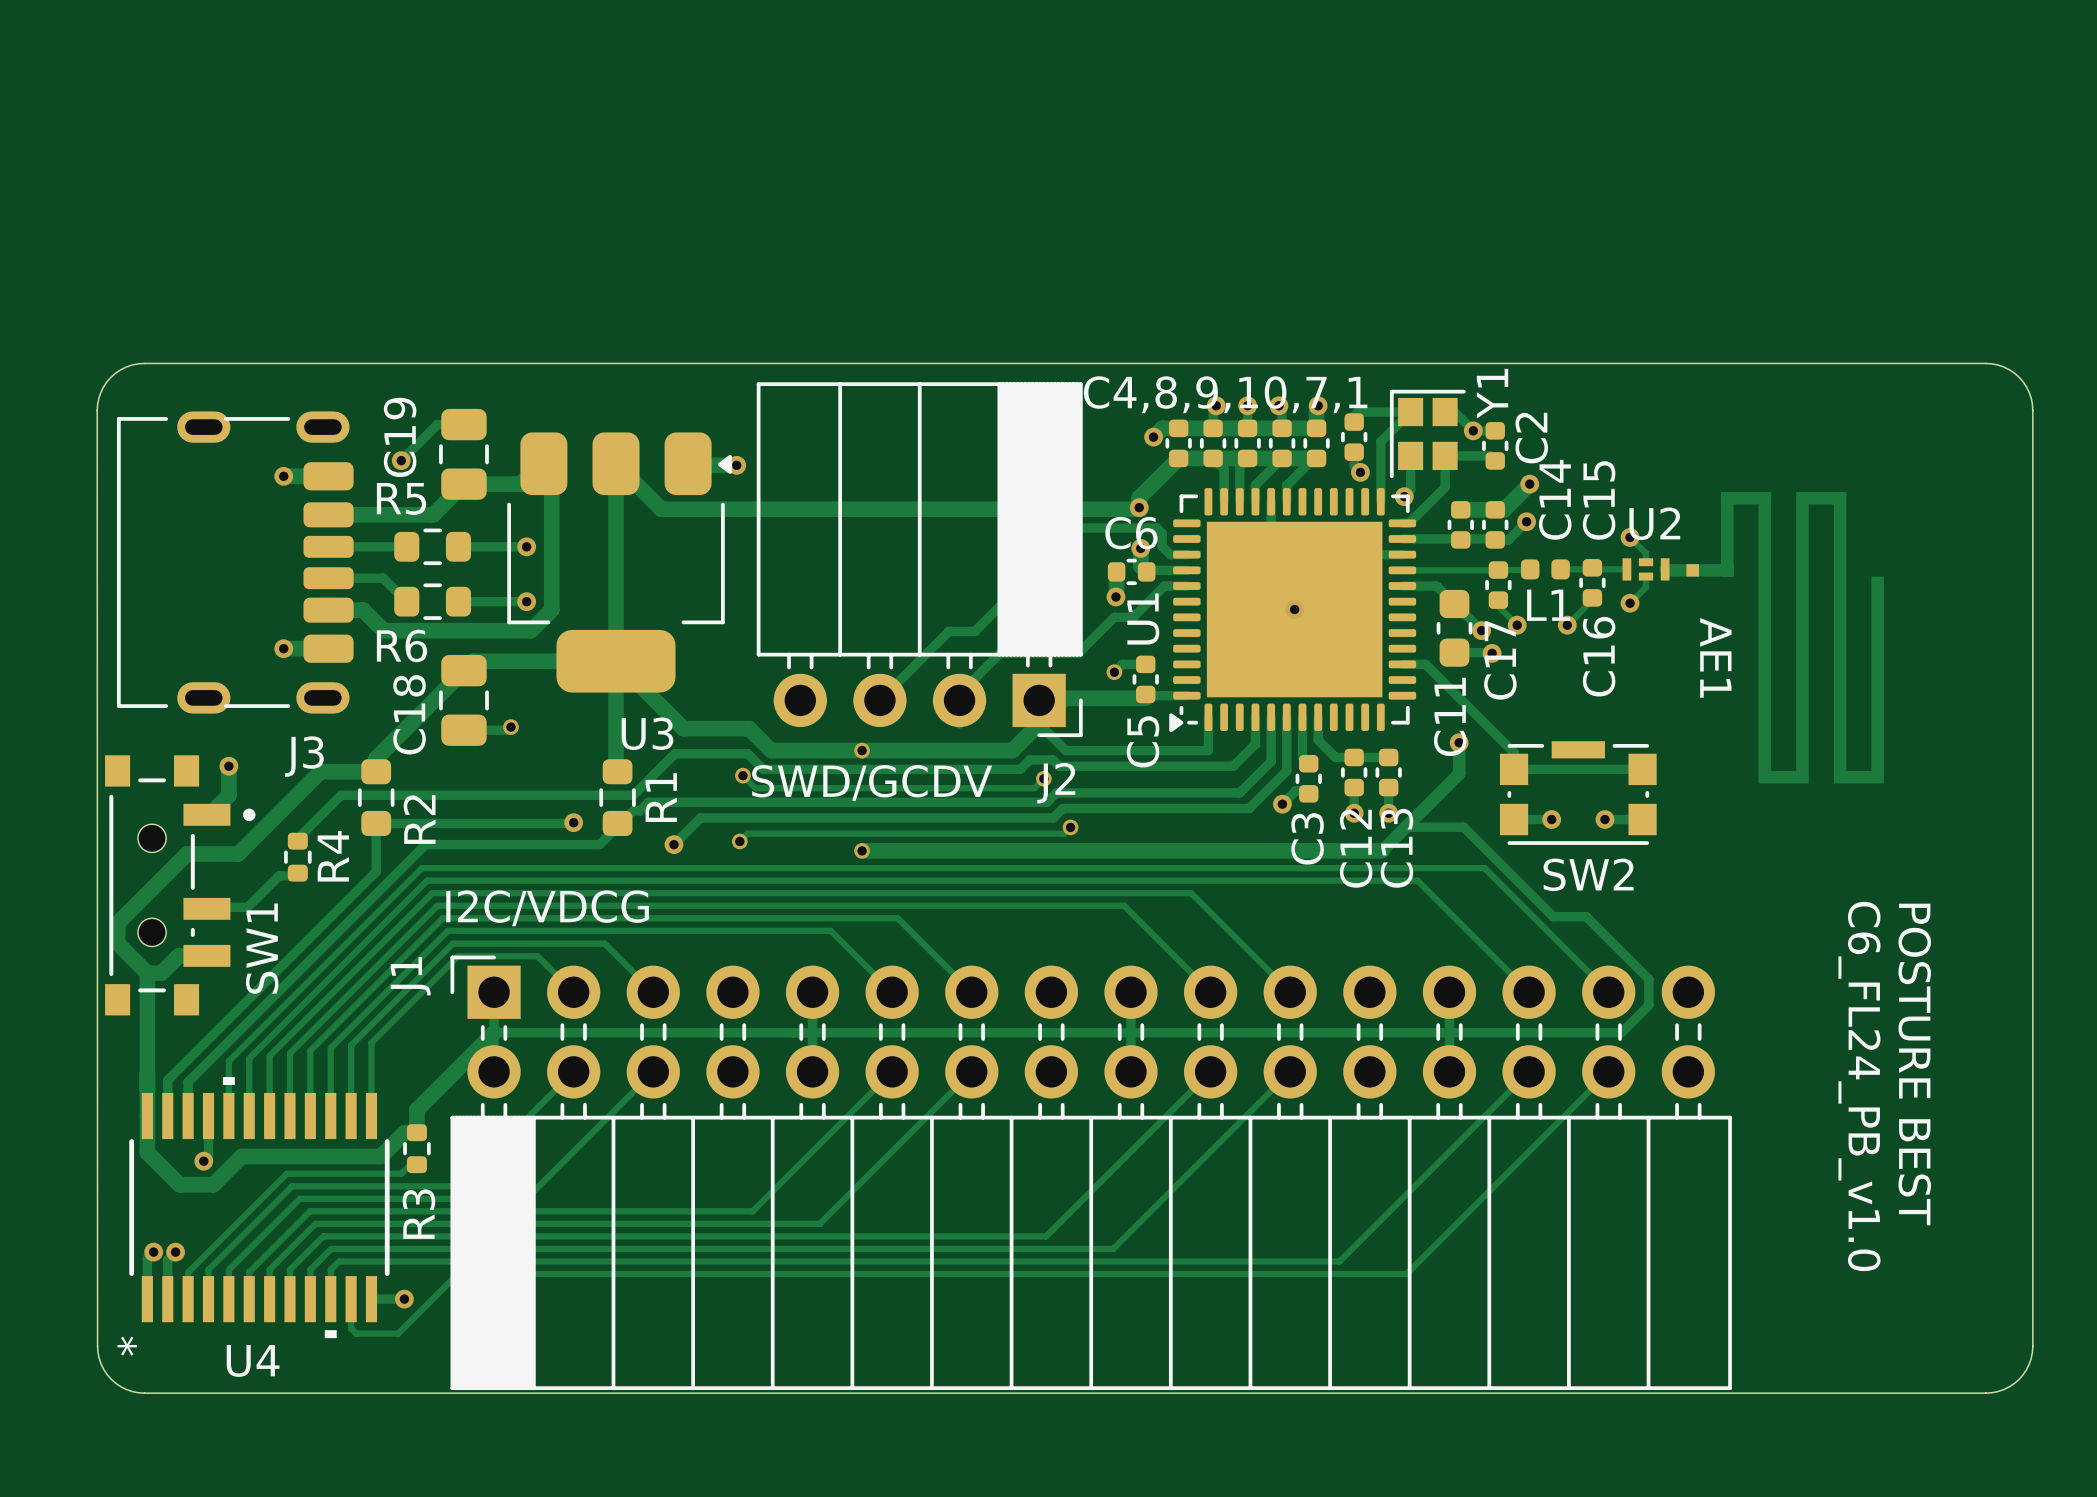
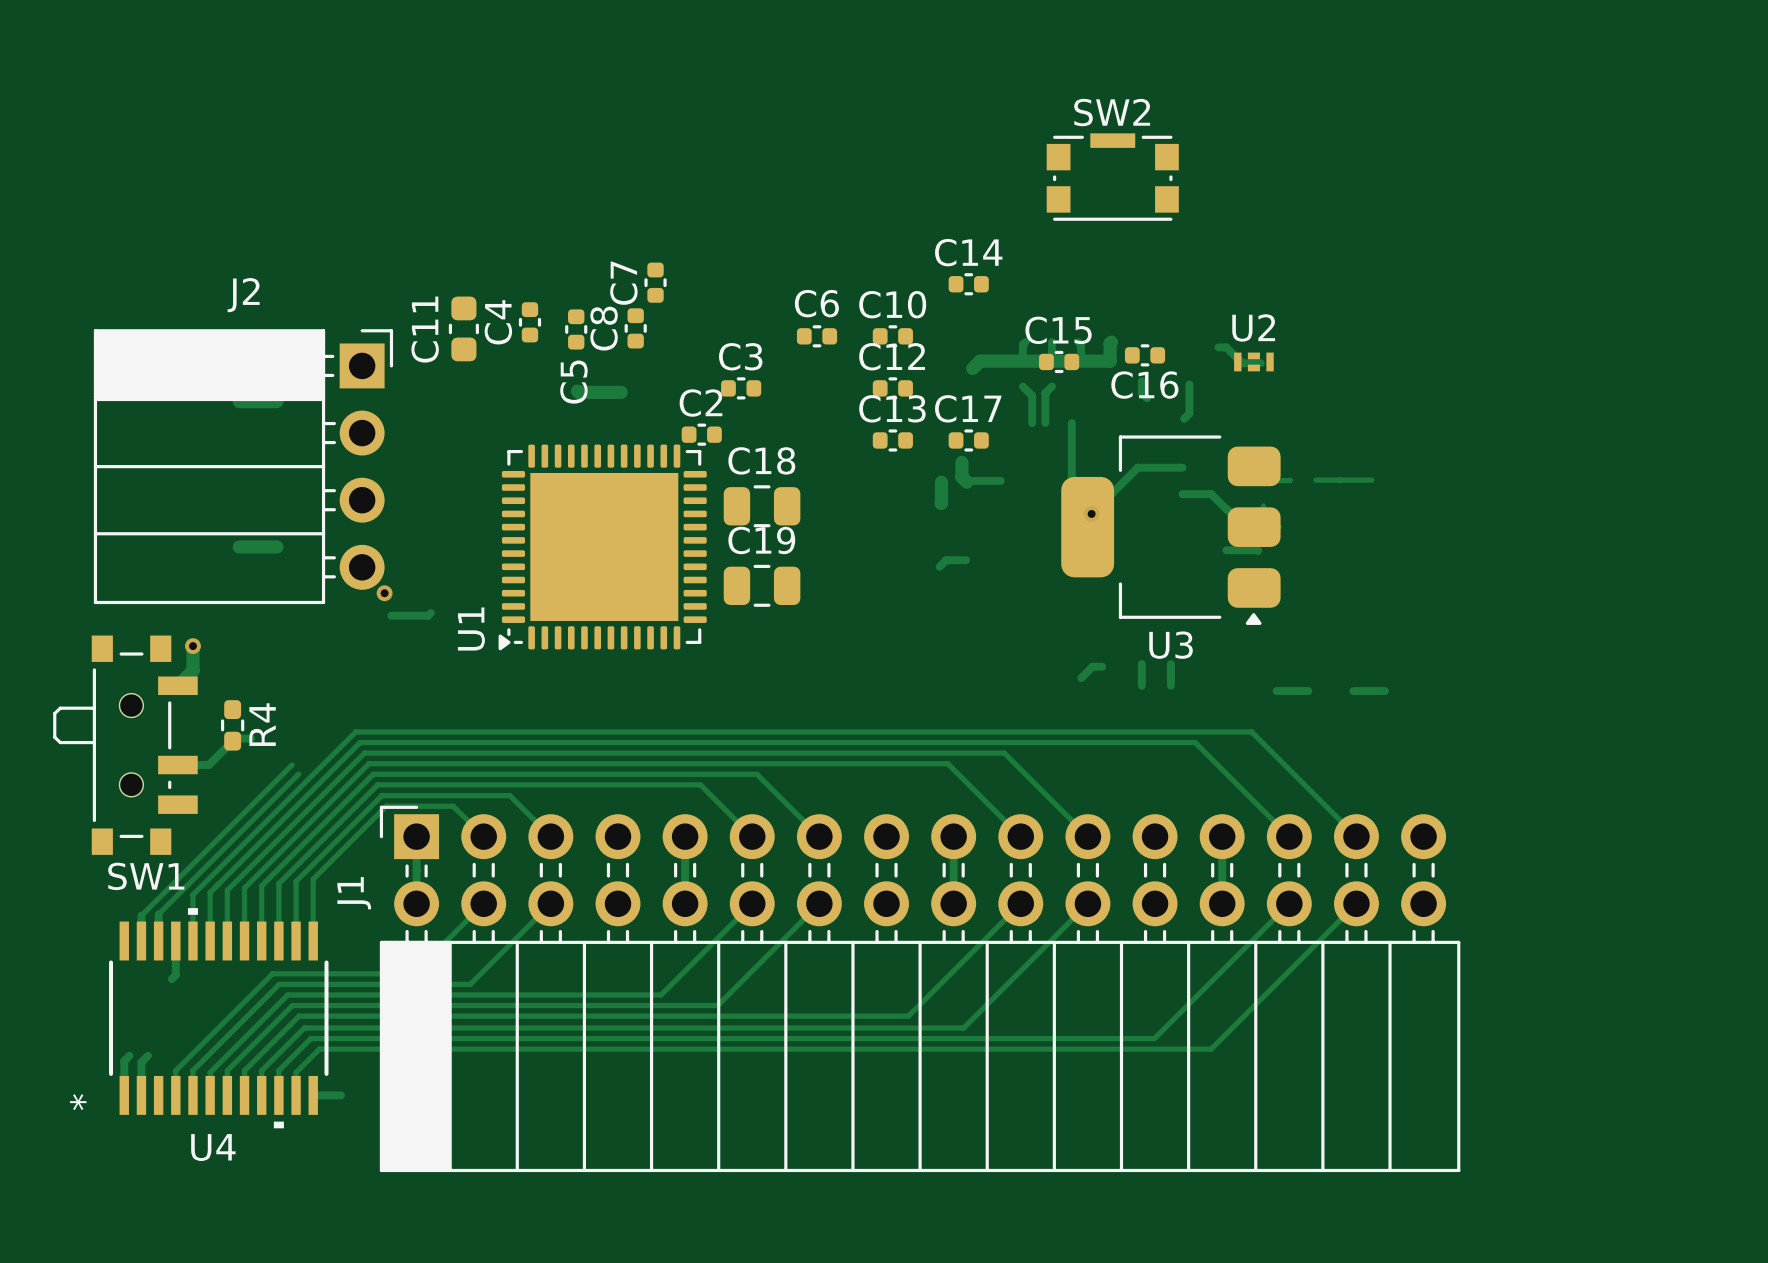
C7: none -> (655, 282)
board edge: (144, 363) (1985, 363) (1997, 365) (2009, 369) (2019, 377) (2026, 386) (2031, 398) (2032, 410) (2032, 1346) (2031, 1358) (2026, 1369) (2019, 1379) (2009, 1386) (1997, 1391) (1985, 1393) (144, 1393) (132, 1391) (121, 1386) (111, 1379) (103, 1369) (99, 1358) (97, 1346) (97, 410) (100, 392) (111, 377) (126, 367) (144, 363) -> none
C4: none -> (529, 322)
C8: none -> (635, 328)
text: C4,8,9,10,7,1 (1225, 394) -> none
C10: none -> (892, 336)
via: (1216, 405) -> none
via: (1247, 405) -> none
via: (1278, 405) -> none
via: (1318, 405) -> none
track: (1354, 415) (1357, 412) (1410, 412) (1380, 441) (1380, 501) -> none
track: (463, 424) (437, 424) (401, 460) -> none
via: (1473, 430) -> none
Y1: (1427, 433) -> none
via: (1153, 437) -> none
part: (1354, 437) -> none
part: (1178, 443) -> none
part: (1213, 443) -> none
part: (1247, 443) -> none
part: (1282, 443) -> none
part: (1316, 443) -> none
C2 rotation: 0° (1495, 445) -> 90° clockwise (701, 434)
C2 position: (1495, 445) -> (701, 434)
C19 rotation: 0° (463, 454) -> 90° clockwise (762, 585)
C19 position: (463, 454) -> (762, 585)
track: (1282, 458) (1255, 485) (1255, 501) -> none
via: (401, 460) -> none
track: (1495, 460) (1490, 455) (1445, 455) (1445, 487) (1409, 523) (1402, 523) -> none
track: (531, 463) (540, 463) (520, 484) (463, 484) (433, 514) (328, 514) -> none
track: (543, 463) (551, 471) (551, 609) (530, 630) (383, 630) (363, 610) (328, 610) -> none
via: (736, 465) -> none
via: (1360, 472) -> none
via: (283, 476) -> none
track: (1529, 484) (1504, 509) (1460, 509) -> none
via: (1529, 484) -> none
via: (1404, 496) -> none
C14 name position: C14 (1555, 499) -> C14 (968, 252)
C15 name position: C15 (1599, 500) -> C15 (1058, 330)
track: (1286, 501) (1286, 485) (1313, 458) (1316, 458) (1178, 458) (1139, 497) (1139, 507) -> none
track: (1139, 507) (661, 509) (616, 463) (616, 773) (617, 774) -> none
via: (1139, 507) -> none
track: (1526, 521) (1508, 539) (1402, 538) -> none
via: (1526, 521) -> none
U2 name position: U2 (1654, 523) -> U2 (1253, 327)
C14 rotation: 0° (1460, 524) -> 90° clockwise (968, 284)
C14 position: (1460, 524) -> (968, 284)
C15 rotation: 0° (1495, 524) -> 90° clockwise (1059, 361)
C15 position: (1495, 524) -> (1059, 361)
track: (1630, 537) (1646, 553) (1646, 562) -> none
via: (1630, 537) -> none
track: (328, 546) (406, 546) -> none
R5: (432, 546) -> none
track: (458, 546) (526, 546) -> none
via: (526, 546) -> none
via: (1140, 548) -> none
track: (1186, 554) (1170, 554) (1162, 546) (1162, 533) (1156, 528) (1078, 528) (974, 631) (948, 631) (879, 700) -> none
J2 rotation: 0° (919, 559) -> 90° counterclockwise (243, 466)
J2 position: (919, 559) -> (243, 466)
J3: (235, 562) -> none
U3 rotation: 0° (619, 562) -> 90° clockwise (1170, 530)
U3 position: (619, 562) -> (1170, 530)
L1: (1545, 569) -> none
U2 position: (1646, 569) -> (1253, 361)
track: (1665, 569) (1692, 570) -> none
track: (1402, 570) (1498, 570) -> none
C6 position: (1131, 571) -> (817, 336)
track: (1646, 576) (1646, 587) (1630, 603) -> none
track: (328, 578) (383, 578) (406, 601) -> none
C16 rotation: 0° (1592, 582) -> 90° clockwise (1145, 355)
C16 position: (1592, 582) -> (1145, 355)
C17 rotation: 0° (1498, 585) -> 90° clockwise (968, 440)
C17 position: (1498, 585) -> (968, 440)
track: (1186, 586) (1164, 586) (1133, 617) (1114, 617) (1078, 653) (999, 653) (959, 693) (959, 723) -> none
via: (1115, 596) -> none
track: (1589, 600) (1589, 603) (1567, 625) -> none
R6: (432, 601) -> none
track: (458, 601) (526, 601) -> none
via: (526, 601) -> none
via: (1630, 603) -> none
U1 position: (1292, 610) -> (602, 547)
U1 name position: U1 (1143, 619) -> U1 (471, 629)
via: (1517, 625) -> none
via: (1567, 625) -> none
C11 position: (1454, 628) -> (463, 328)
via: (1481, 630) -> none
AE1: (1785, 637) -> none
via: (283, 648) -> none
via: (1492, 653) -> none
C17 name position: C17 (1500, 660) -> C17 (968, 408)
track: (1402, 664) (1425, 664) (1514, 752) (1514, 769) -> none
via: (1114, 672) -> none
C5 position: (1145, 679) -> (576, 329)
track: (1186, 695) (1148, 695) (1145, 698) (1064, 698) (1012, 750) (771, 750) (749, 728) (683, 728) (616, 661) (473, 661) (376, 758) (376, 771) (320, 771) (238, 854) (187, 854) (117, 923) (117, 943) (147, 973) -> none
C18 rotation: 0° (463, 700) -> 90° clockwise (762, 506)
C18 position: (463, 700) -> (762, 506)
via: none -> (384, 593)
C11 name position: C11 (1450, 716) -> C11 (425, 329)
track: (1208, 717) (1207, 750) (1065, 750) (1039, 723) -> none
track: (1255, 717) (1255, 744) (1233, 766) (1059, 766) (1053, 759) (1029, 759) (1020, 769) (763, 769) (747, 753) (675, 753) (633, 795) (341, 795) (297, 838) -> none
track: (1271, 717) (1271, 761) (1239, 792) (1056, 792) (1046, 802) (648, 802) (639, 810) (633, 810) (599, 844) (425, 844) (188, 1082) (188, 1084) -> (298, 774) (158, 914)
track: (1286, 717) (1286, 770) (1249, 808) (1062, 808) (1053, 817) (700, 817) (673, 844) -> none
track: (1302, 717) (1302, 757) (1308, 763) -> none
track: (1318, 717) (1318, 740) (1335, 757) (1388, 757) -> none
via: (510, 727) -> none
track: (1459, 742) (1459, 773) (1382, 850) (862, 850) -> none
via: (1459, 742) -> none
via: (862, 750) -> none
SW1 footprint: [105, 755, 256, 1016] -> [53, 635, 198, 855]
track: (1506, 769) (1642, 769) -> none
C12 rotation: 0° (1354, 772) -> 90° clockwise (892, 388)
C12 position: (1354, 772) -> (892, 388)
C13 rotation: 0° (1388, 772) -> 90° clockwise (892, 440)
C13 position: (1388, 772) -> (892, 440)
track: (742, 775) (755, 788) (1034, 788) (1043, 778) -> none
via: (742, 775) -> none
via: (1043, 778) -> none
C3 rotation: 0° (1308, 778) -> 90° clockwise (741, 388)
C3 position: (1308, 778) -> (741, 388)
text: SWD/GCDV (872, 782) -> none
J2 name position: J2 (1056, 783) -> J2 (243, 295)
SW2 position: (1578, 793) -> (1112, 177)
R2: (376, 797) -> none
R1: (617, 797) -> none
via: (1282, 804) -> none
via: (1354, 813) -> none
via: (1388, 813) -> none
via: (1551, 819) -> none
via: (1604, 819) -> none
track: (573, 822) (376, 823) (376, 871) (167, 1080) (167, 1085) -> (292, 765) (141, 915)
via: (573, 822) -> none
track: (1070, 827) (1064, 833) (747, 833) (739, 841) -> none
via: (1070, 827) -> none
track: (1405, 827) (1463, 827) (1553, 916) (1586, 916) (1648, 979) (1648, 1005) (1621, 1032) (494, 1032) (416, 1109) (416, 1132) (404, 1132) (380, 1156) (241, 1156) (213, 1184) (179, 1184) (147, 1152) (147, 973) -> none
R4 footprint: [284, 832, 312, 882] -> [221, 700, 245, 751]
C3 name position: C3 (1307, 838) -> C3 (740, 356)
via: (739, 841) -> none
via: (673, 844) -> none
C12 name position: C12 (1356, 848) -> C12 (892, 356)
C13 name position: C13 (1396, 848) -> C13 (892, 408)
via: (862, 850) -> none
R4 name position: R4 (333, 856) -> R4 (262, 724)
SW2 name position: SW2 (1588, 874) -> SW2 (1112, 112)
text: I2C/VDCG (547, 908) -> none
SW1 name position: SW1 (262, 948) -> SW1 (146, 876)
track: (206, 955) (178, 955) (161, 973) (147, 973) -> none
J1 name position: J1 (410, 976) -> J1 (354, 893)
text: POSTURE BEST (1914, 1064) -> none
text: C6_FL24_PB_v1.0 (1859, 1086) -> none
R3: (416, 1148) -> none
track: (490, 1154) (459, 1186) (291, 1186) -> (413, 973) (272, 973) (246, 1000)
via: (203, 1161) -> none
track: (416, 1164) (410, 1164) (401, 1173) (286, 1173) (188, 1272) (188, 1299) -> none
track: (557, 1167) (526, 1198) (299, 1198) -> (470, 984) (279, 984) (252, 1010)
track: (784, 1180) (752, 1211) (309, 1211) -> (661, 994) (287, 994) (261, 1021)
track: (851, 1192) (819, 1223) (315, 1223) -> (717, 1005) (292, 1005) (266, 1031)
track: (1077, 1205) (1046, 1236) (323, 1236) -> (908, 1016) (299, 1016) (272, 1042)
track: (1142, 1219) (1113, 1248) (331, 1248) -> (963, 1028) (304, 1028) (279, 1053)
track: (1369, 1231) (1339, 1261) (339, 1261) -> (1154, 1038) (310, 1038) (285, 1063)
track: (1436, 1244) (1406, 1274) (457, 1274) (398, 1333) (356, 1333) (351, 1328) (351, 1299) -> (1211, 1049) (319, 1049) (296, 1072) (296, 1095)
via: (153, 1252) -> none
via: (175, 1252) -> none
via: (404, 1299) -> none
U4 text position: * (127, 1346) -> * (78, 1102)

